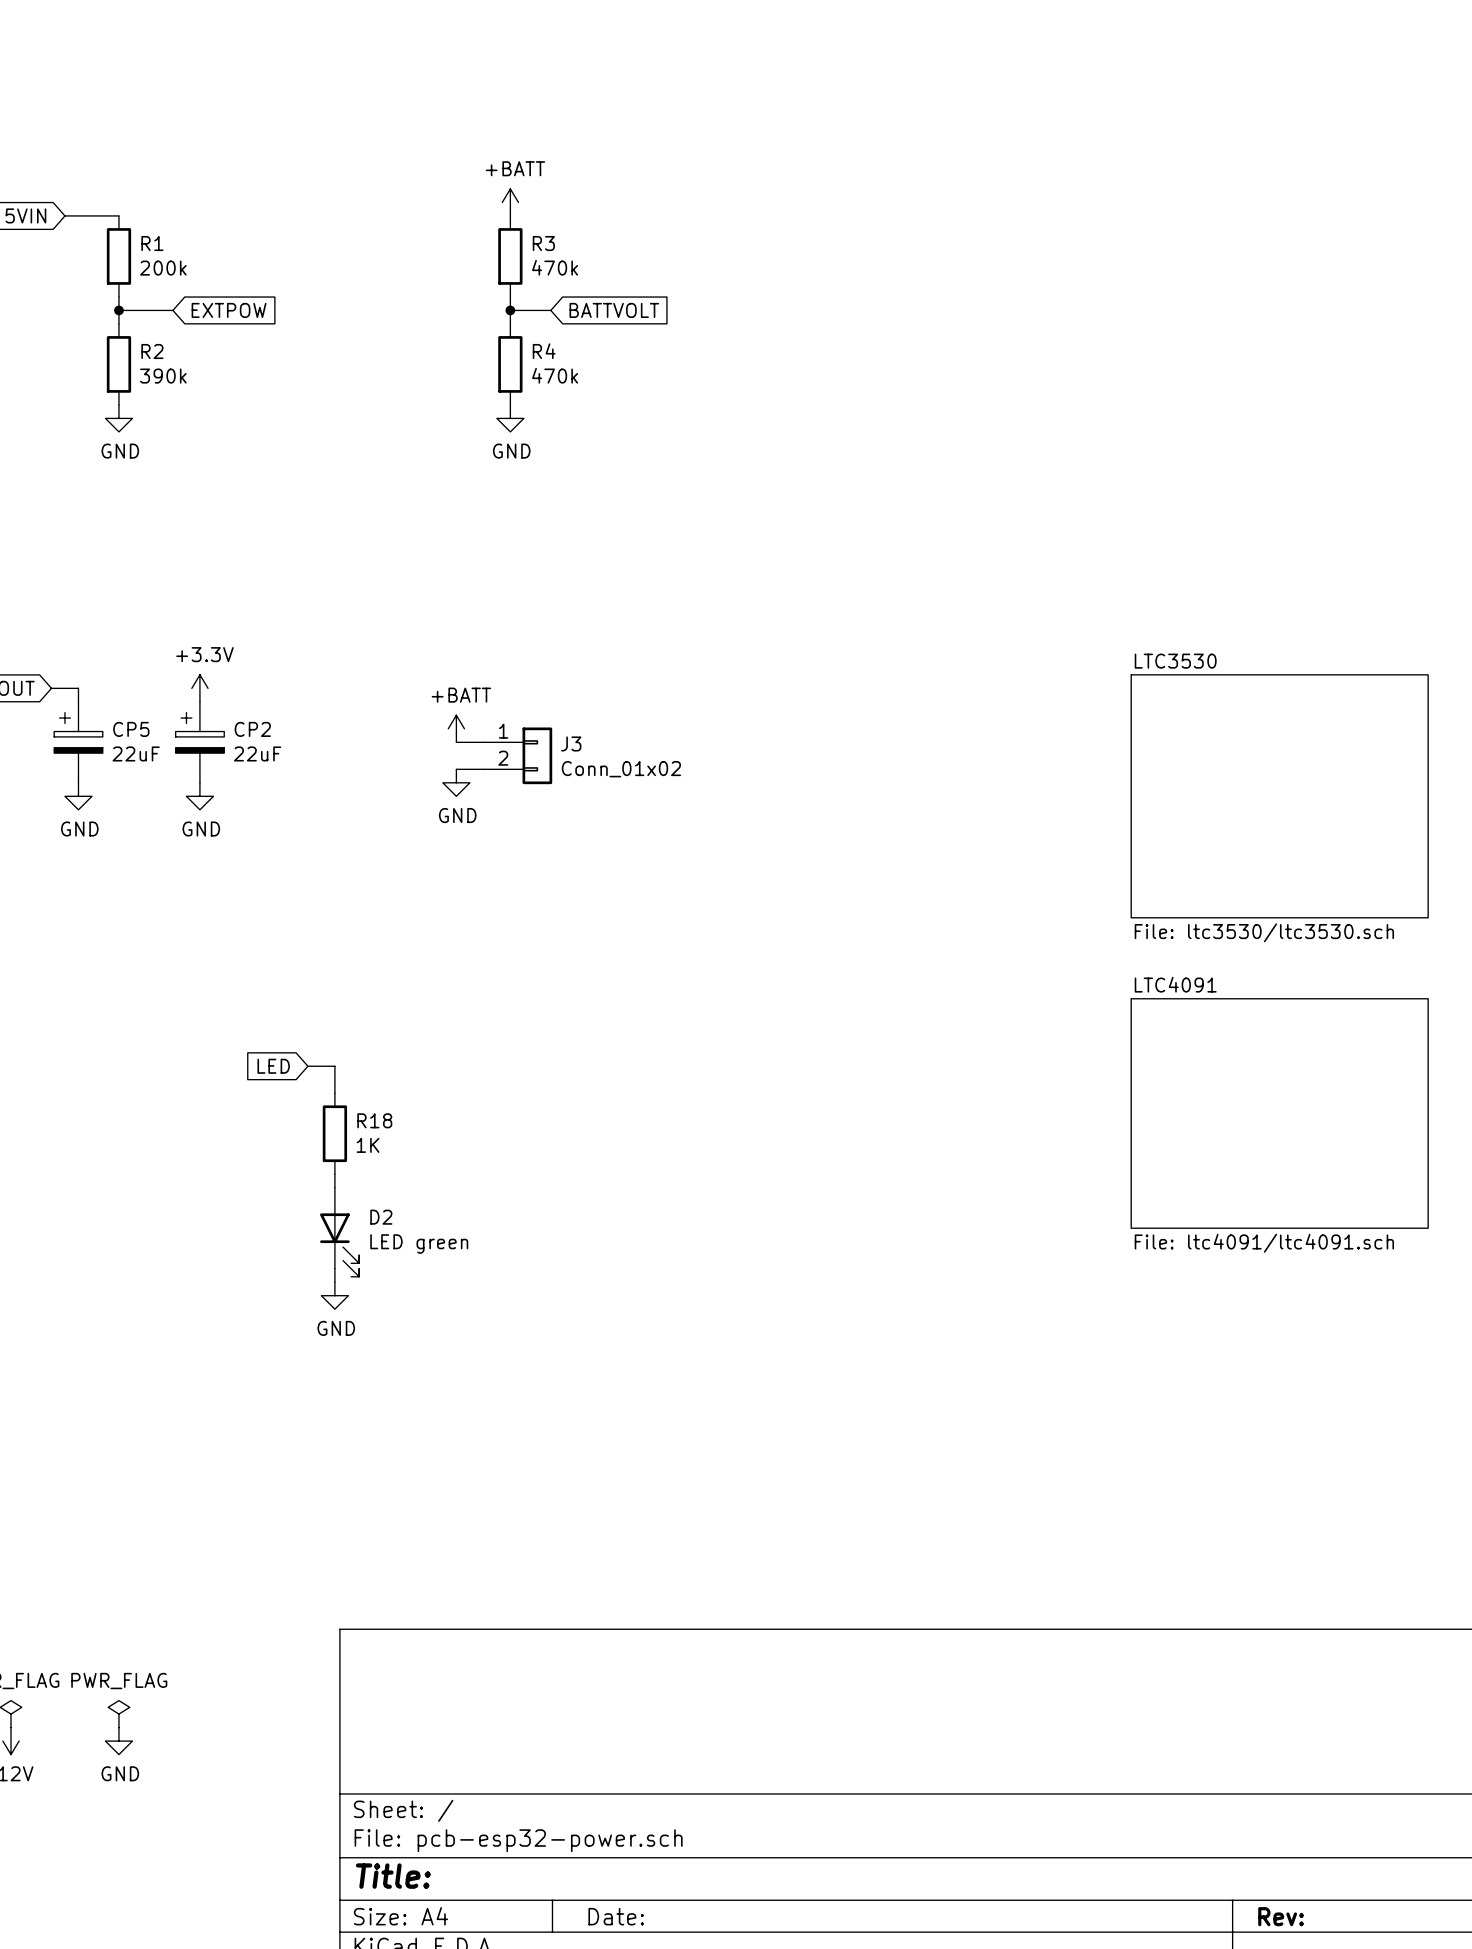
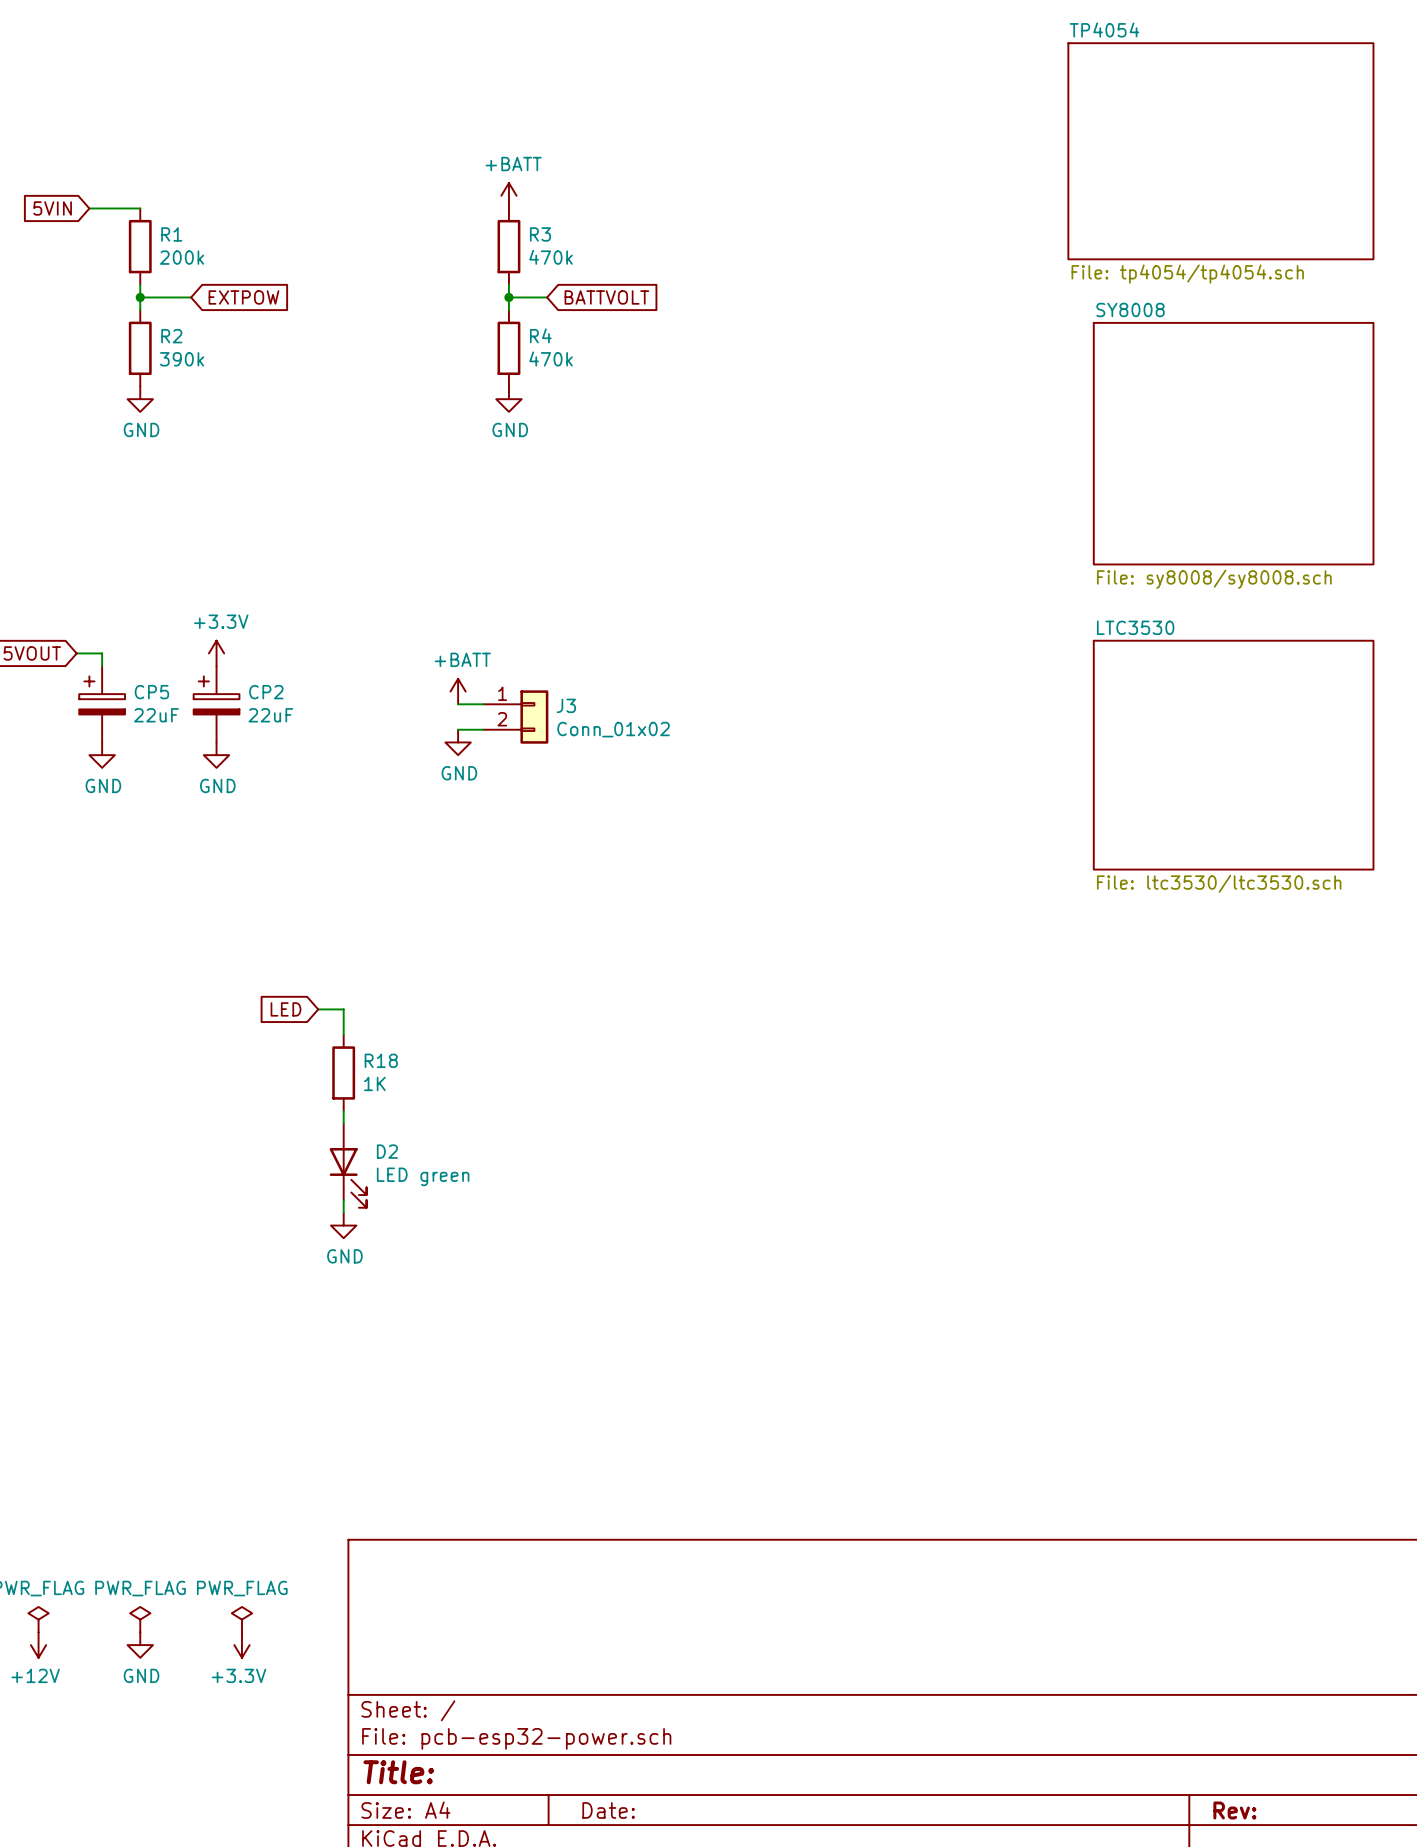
sheet TP4054: none -> File: tp4054/tp4054.sch (1220, 151)
sheet SY8008: none -> File: sy8008/sy8008.sch (1233, 443)
sheet LTC4091: File: ltc4091/ltc4091.sch (1279, 1113) -> none
power symbol: none -> PWR_FLAG (241, 1619)
power symbol: none -> +3.3V (241, 1645)

